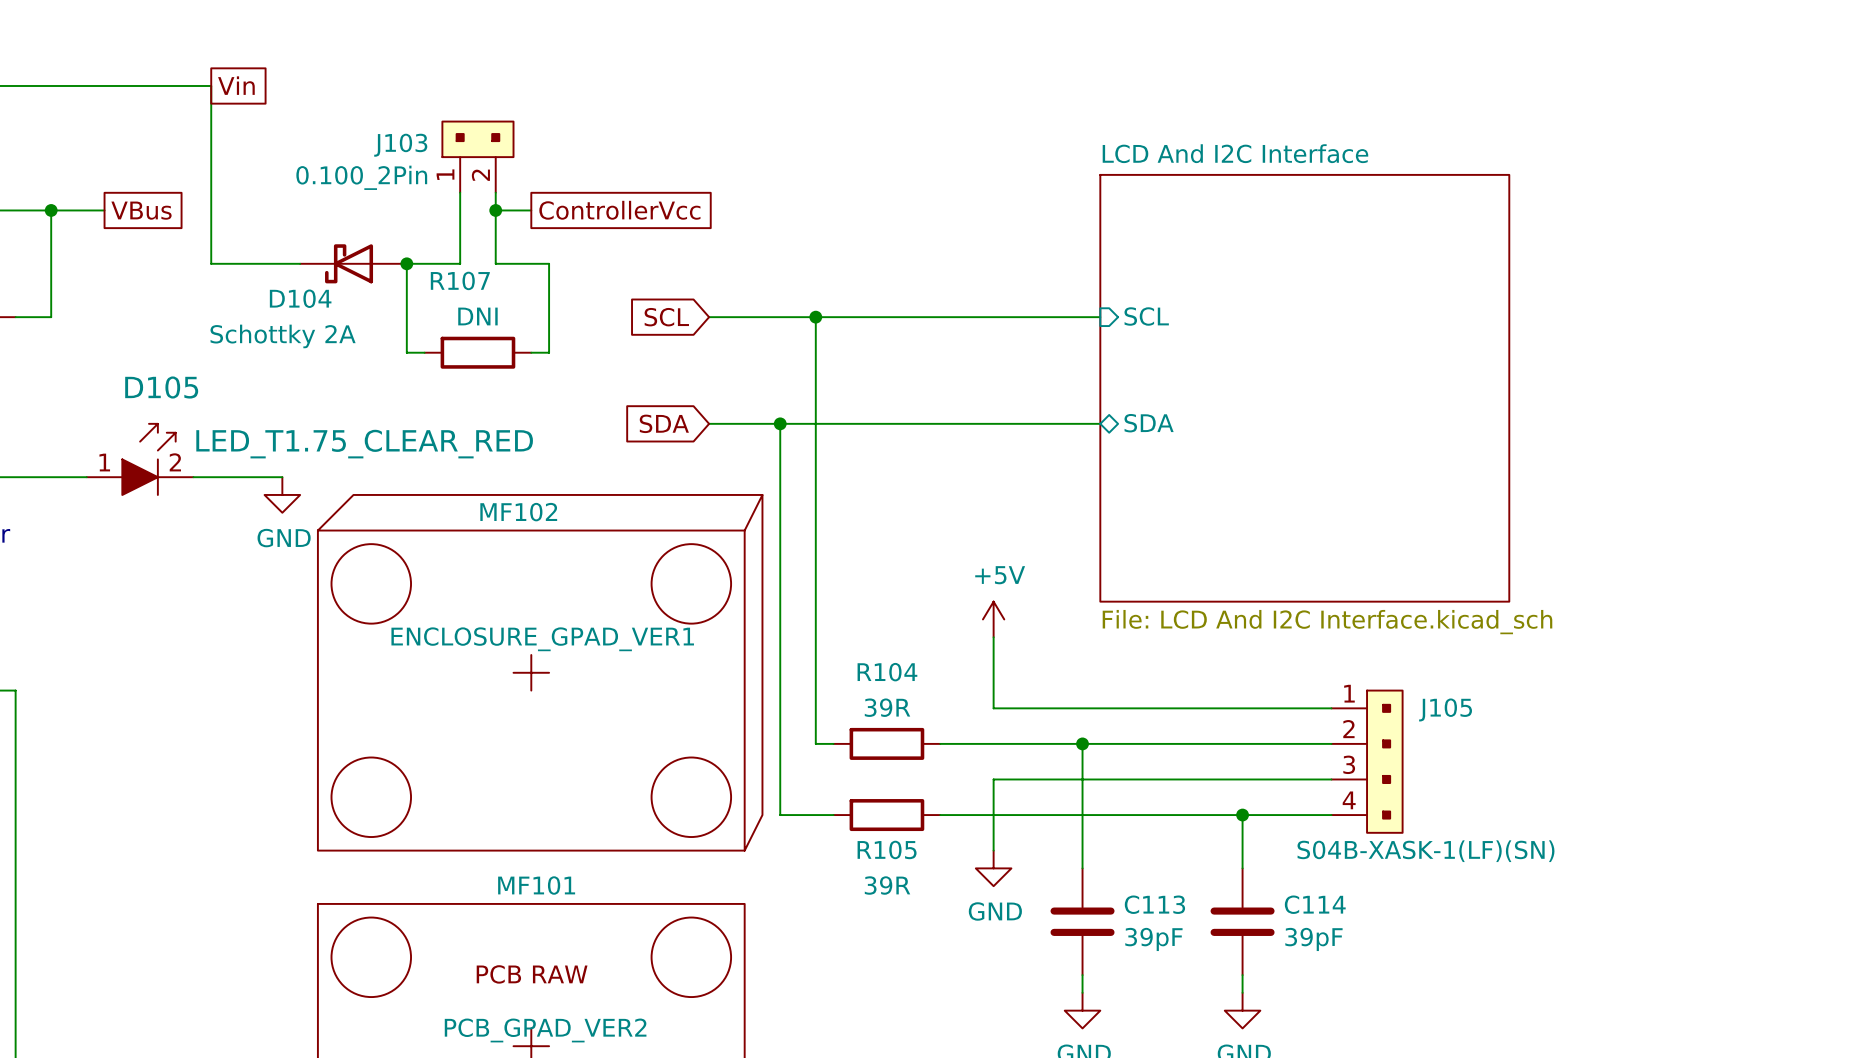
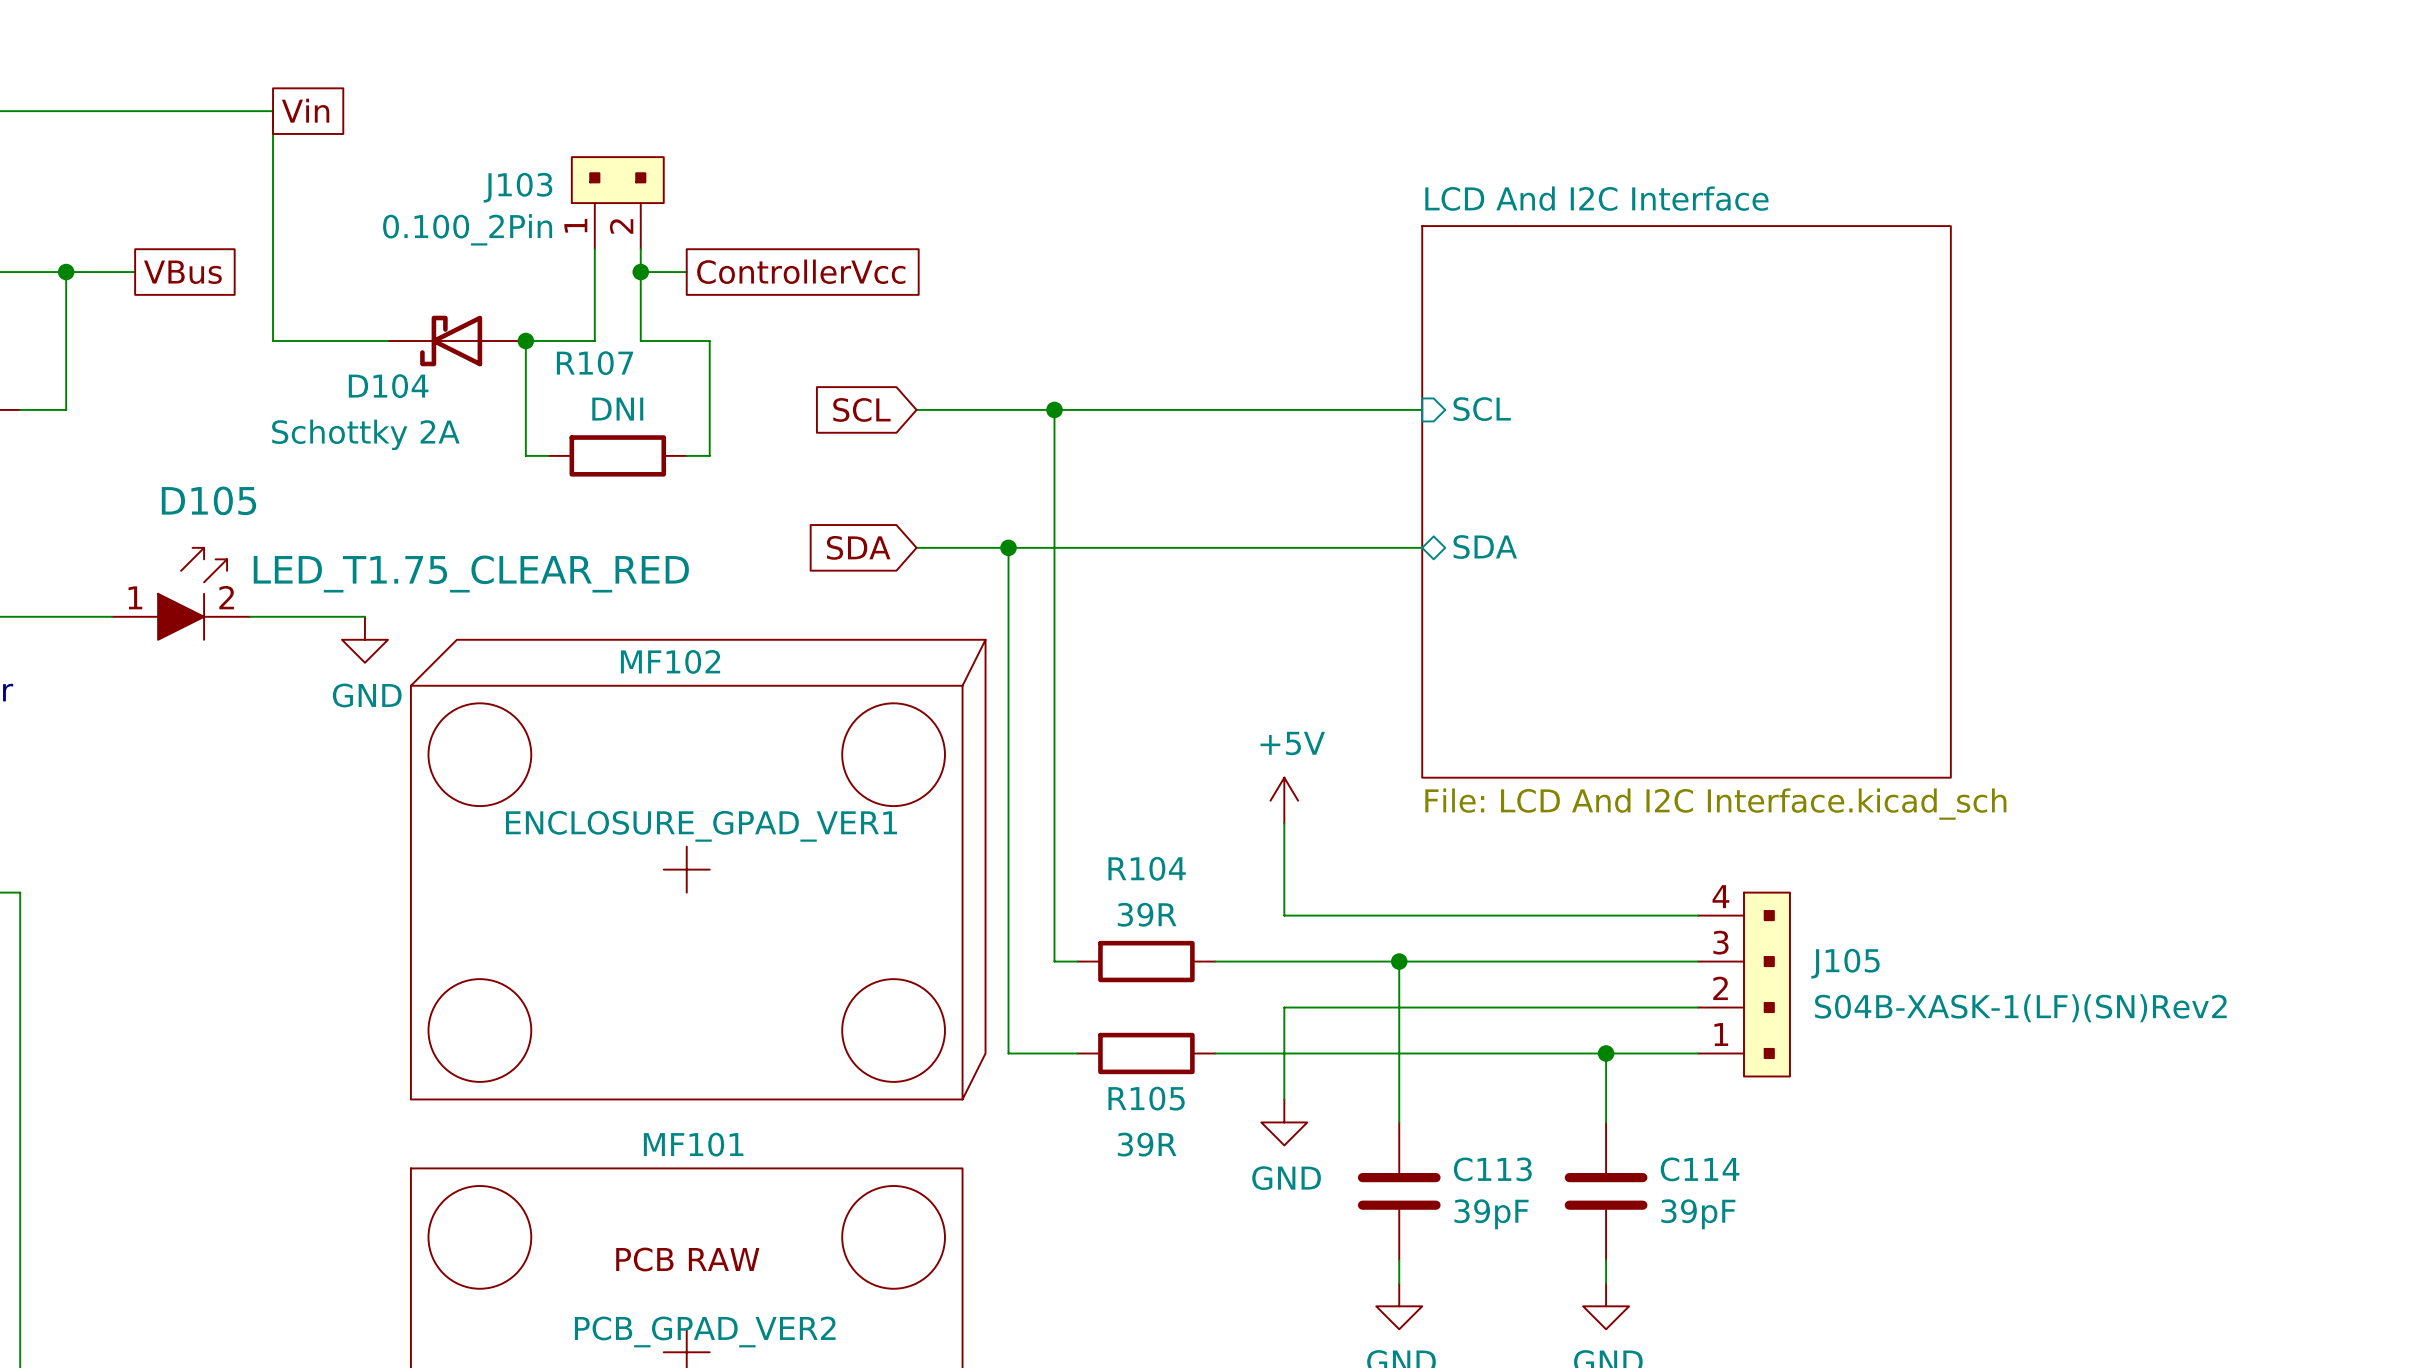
J105 name position: J105 (1445, 709) -> J105 (1845, 963)
J105 flip: as is (1384, 761) -> up-down (1766, 984)
J105 value: S04B-XASK-1(LF)(SN) (1425, 851) -> S04B-XASK-1(LF)(SN)Rev2 (2020, 1008)

